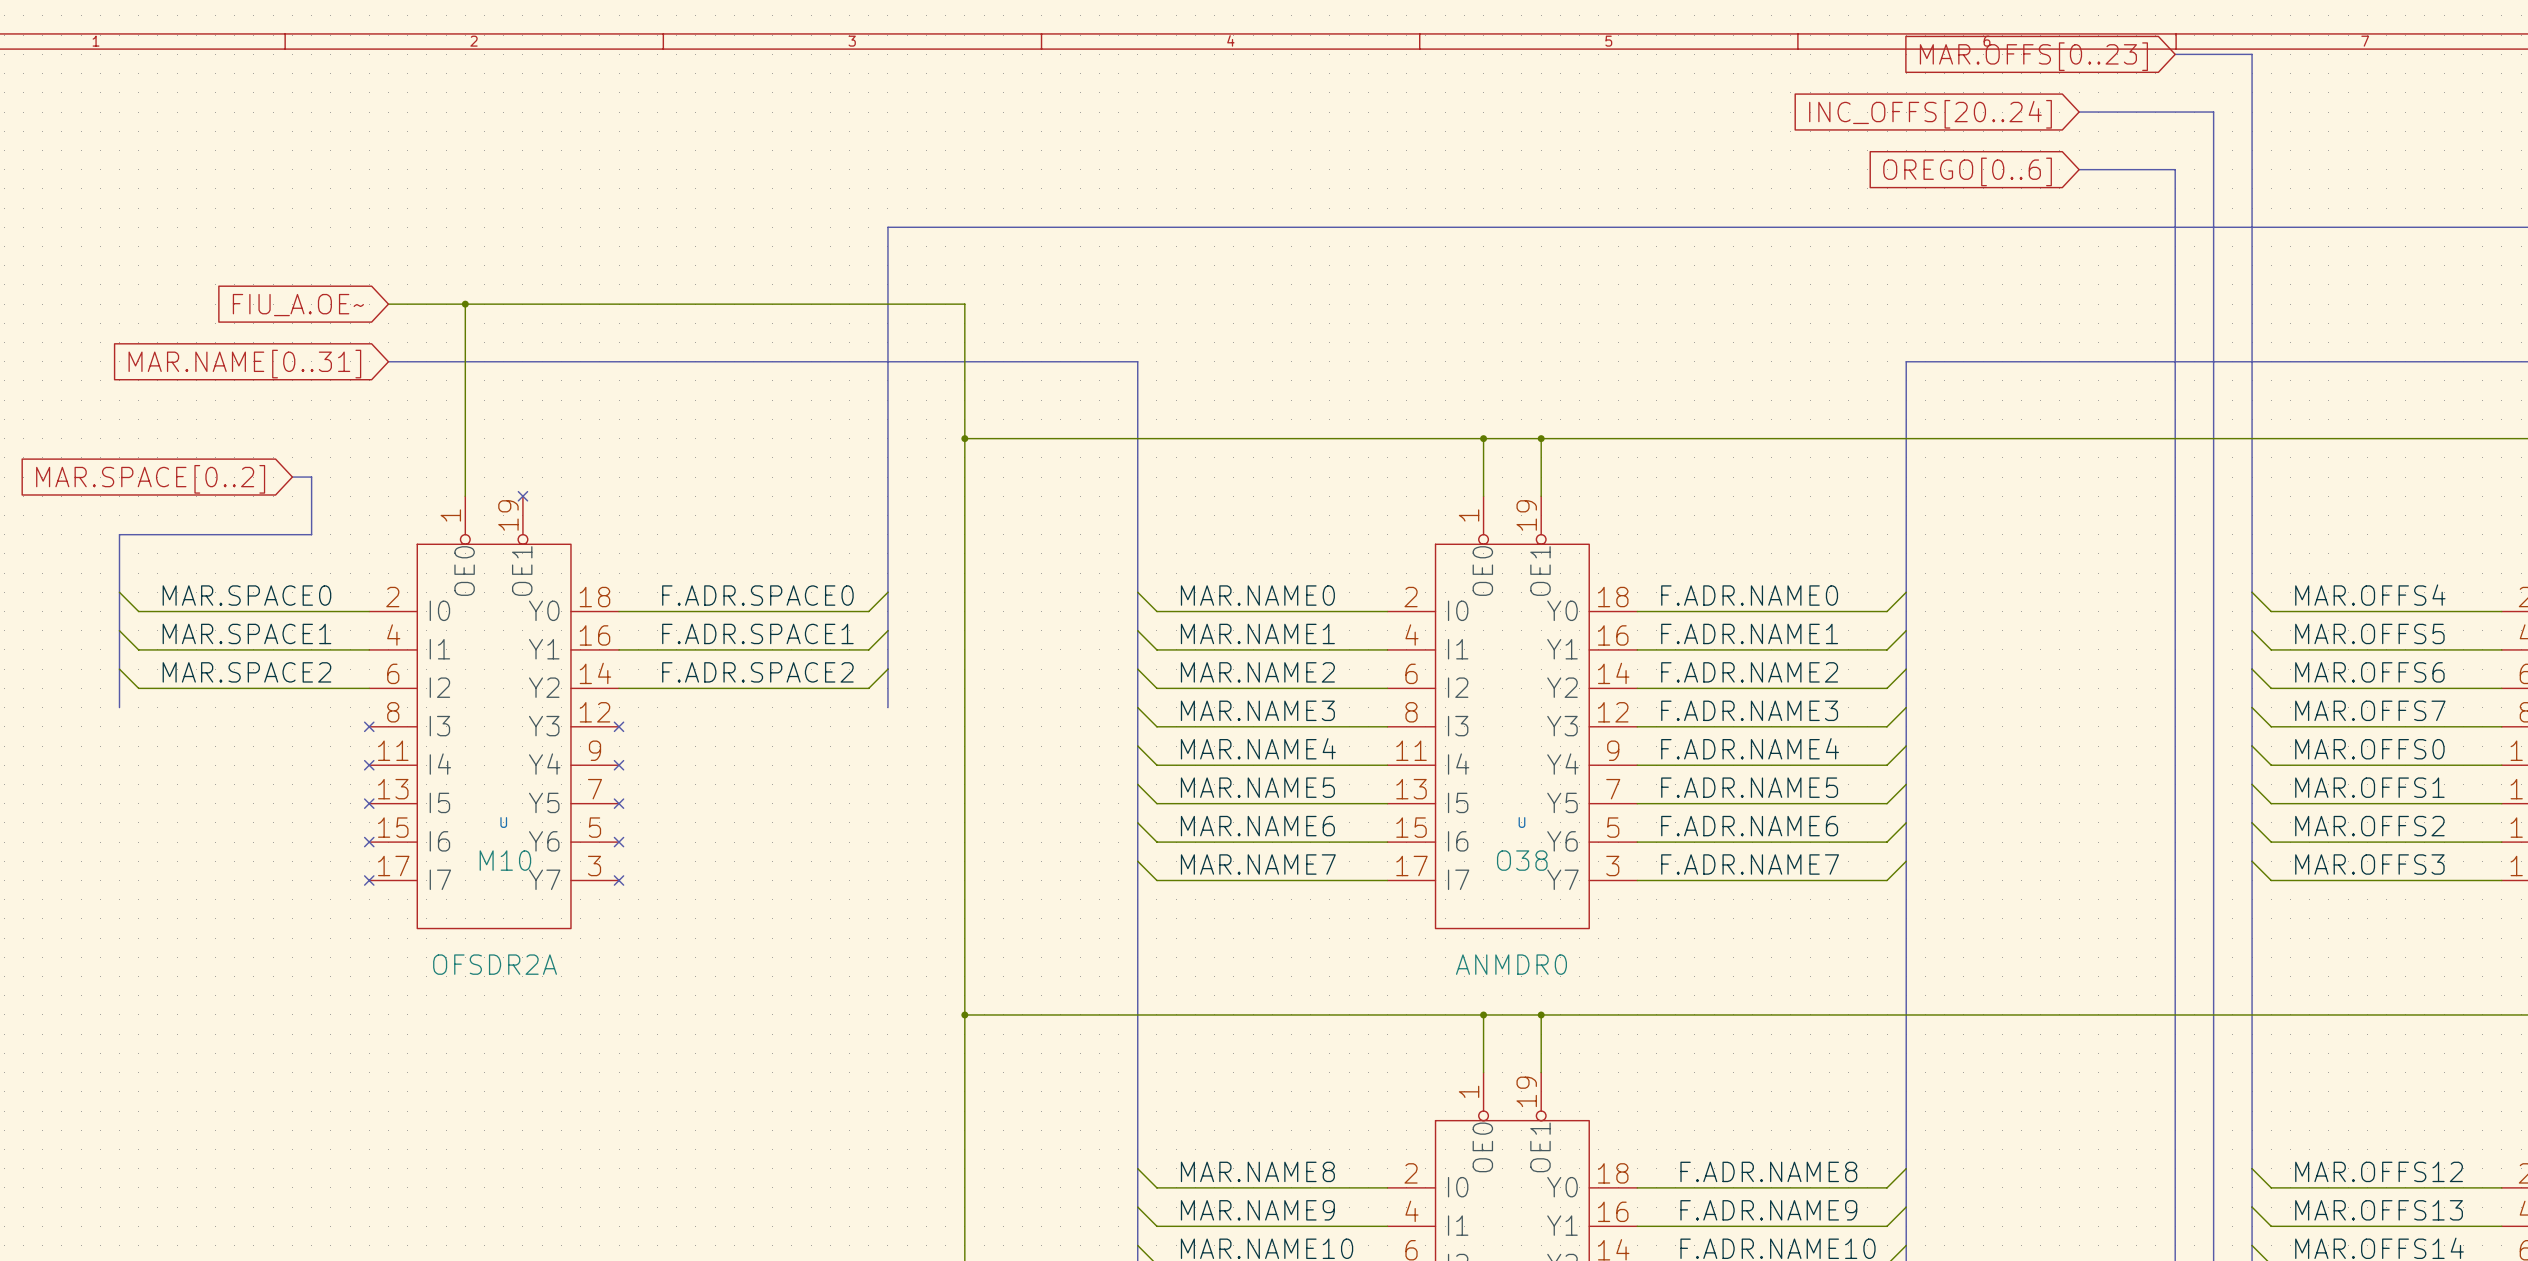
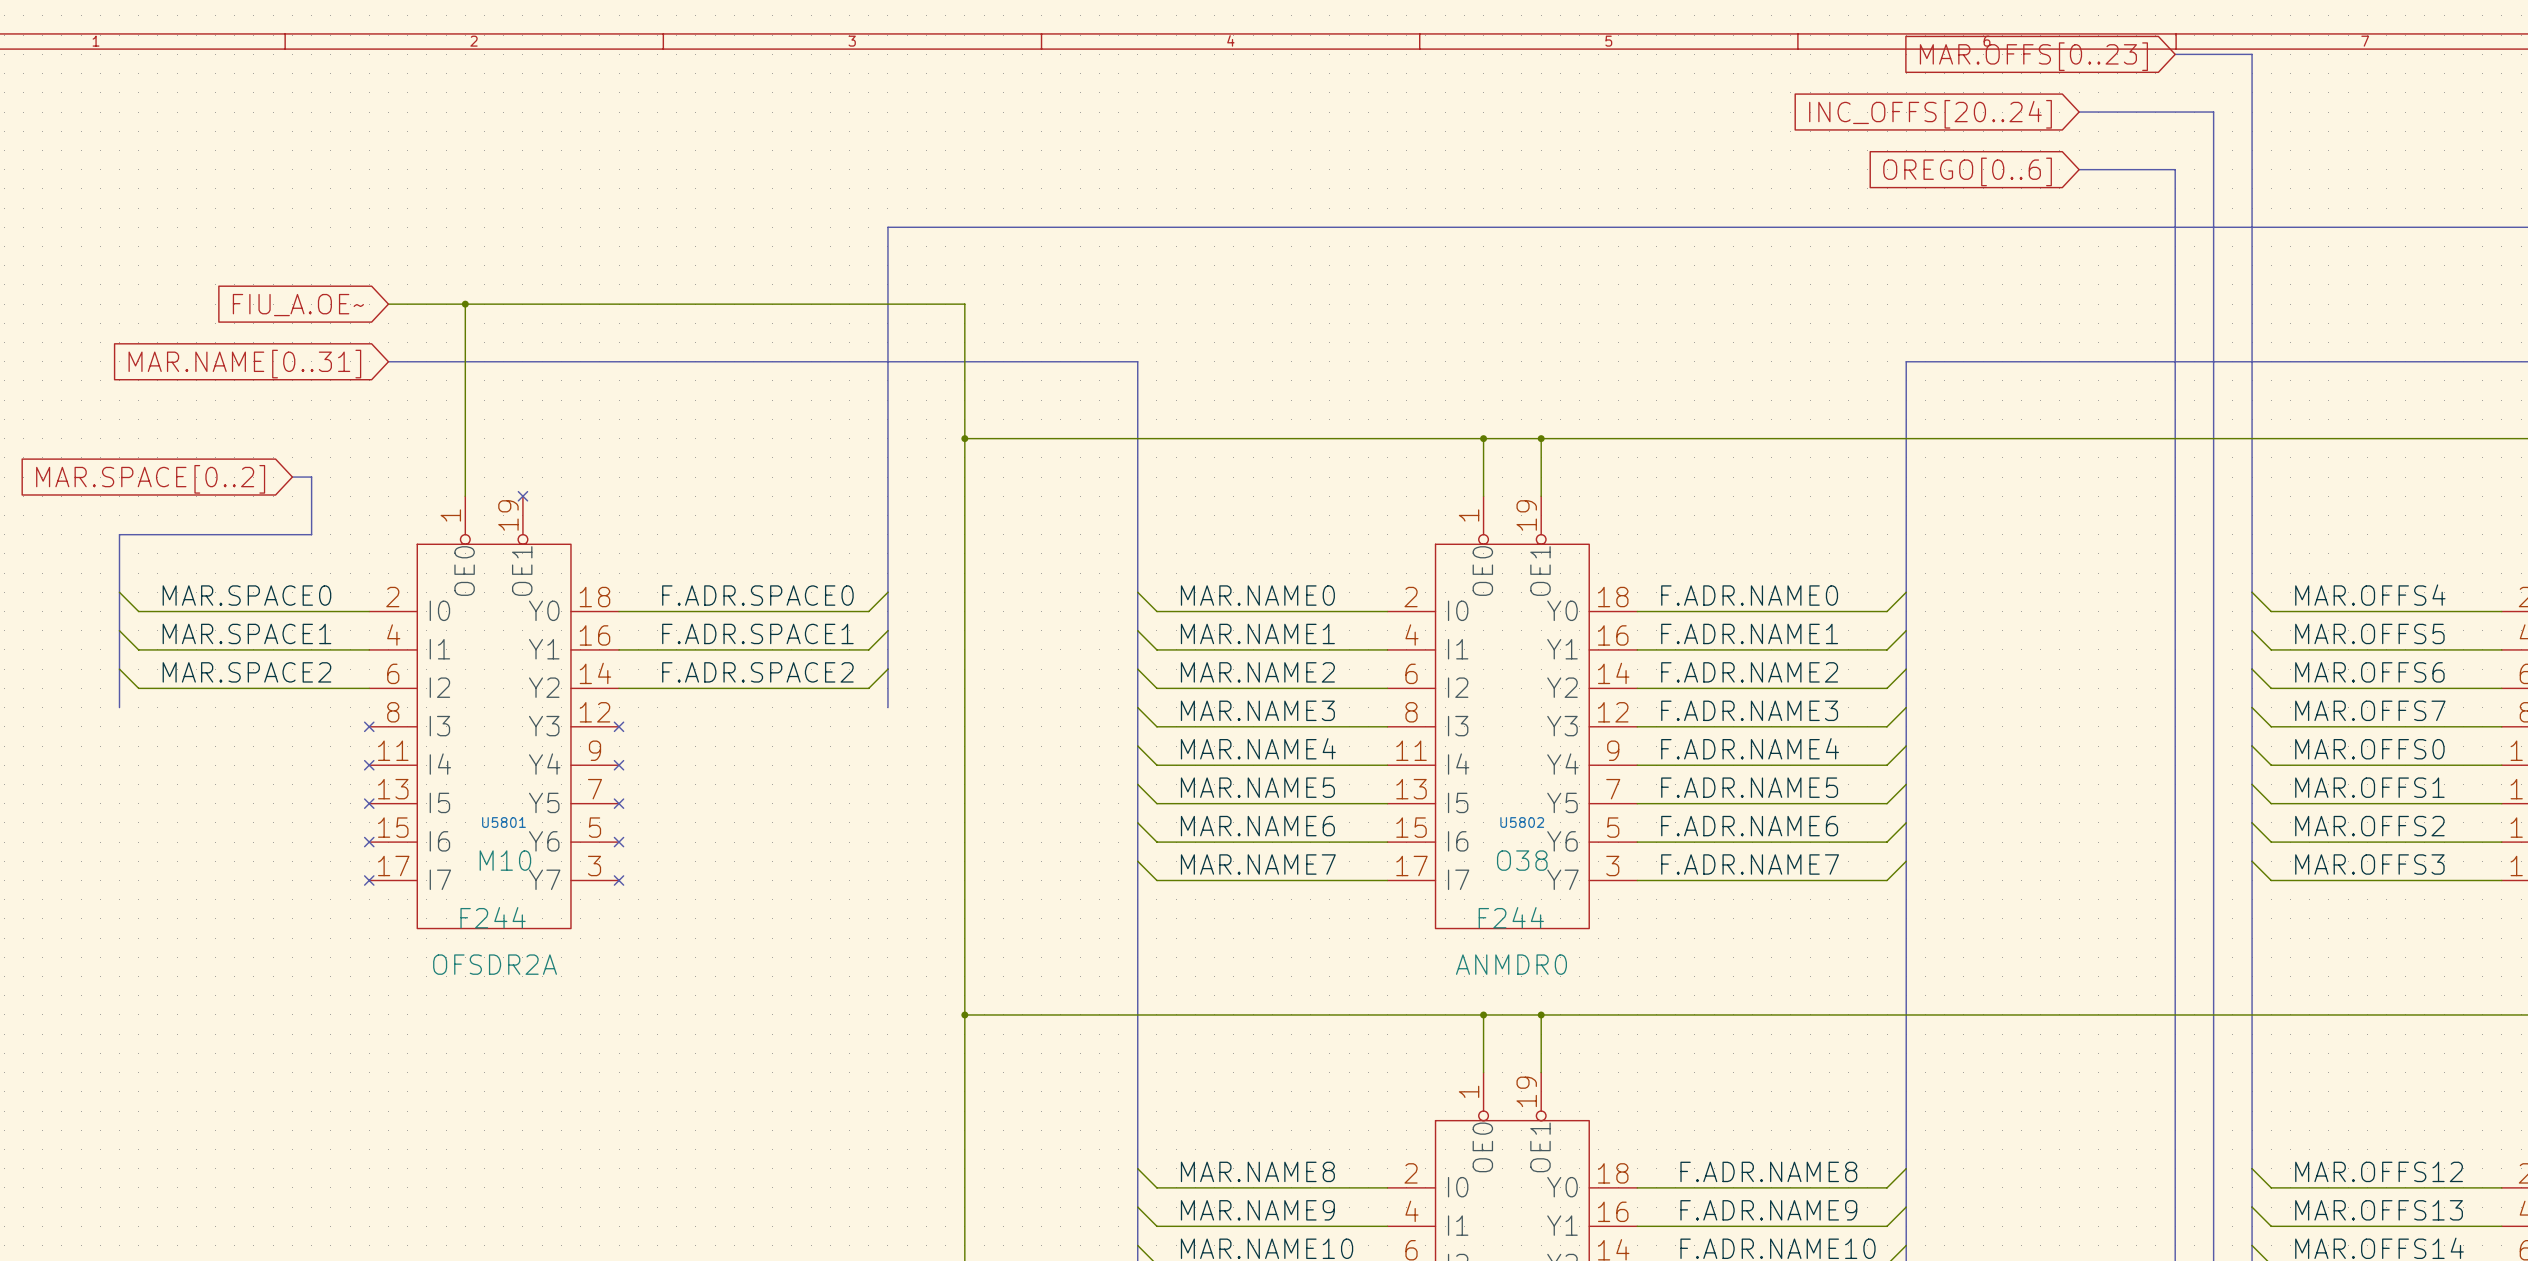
U name: U (503, 822) -> U5801 (503, 822)
U name: U (1521, 822) -> U5802 (1522, 822)
U value: none -> F244 (493, 917)
U value: none -> F244 (1511, 917)

